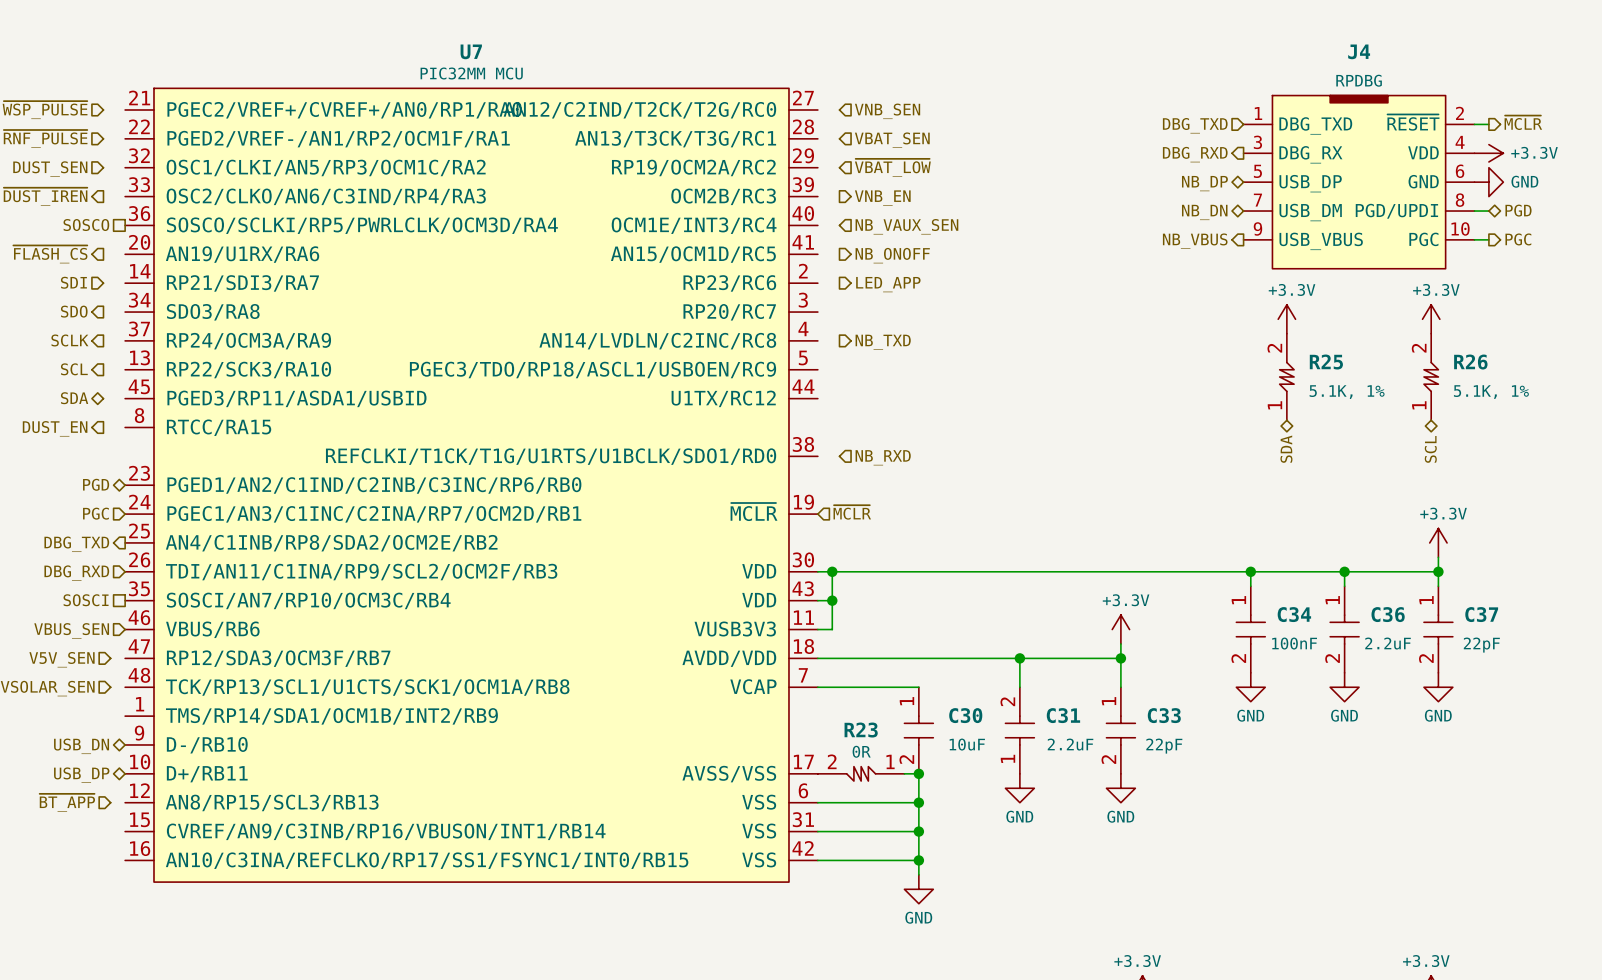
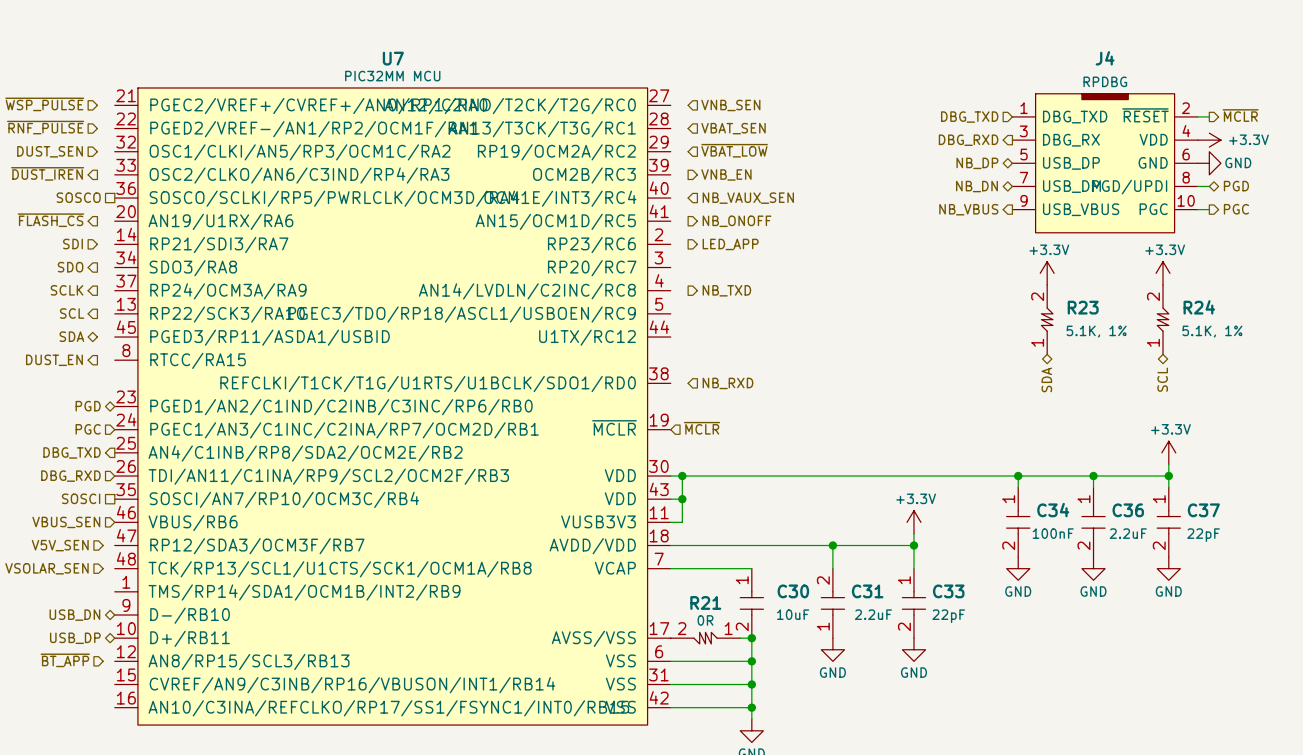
R25 name: R25 (1326, 362) -> R23 (1083, 307)
R26 name: R26 (1470, 362) -> R24 (1199, 307)
R23 name: R23 (861, 730) -> R21 (705, 602)

